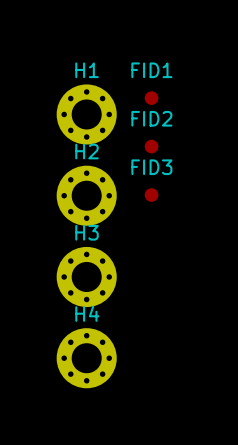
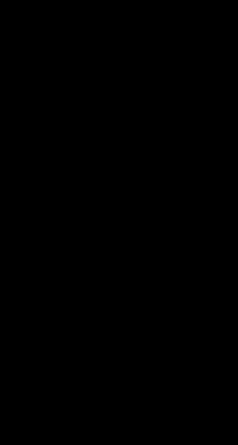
FID1: (151, 98) -> none
H1: (86, 114) -> none
FID2: (151, 146) -> none
H2: (86, 195) -> none
FID3: (151, 195) -> none
H3: (86, 276) -> none
H4: (86, 358) -> none

